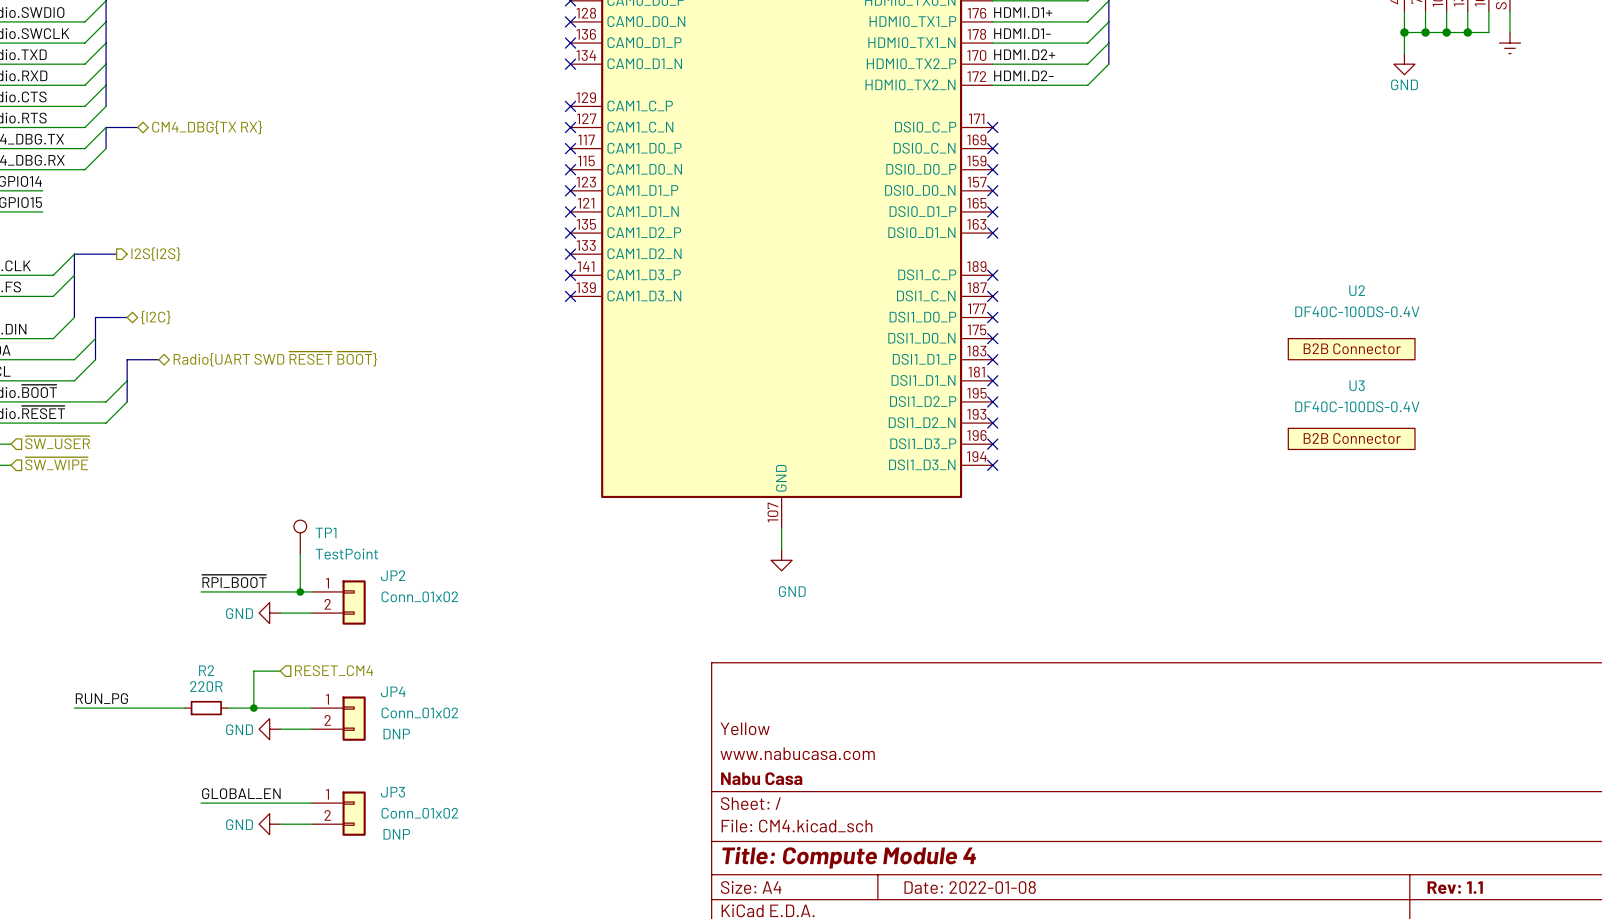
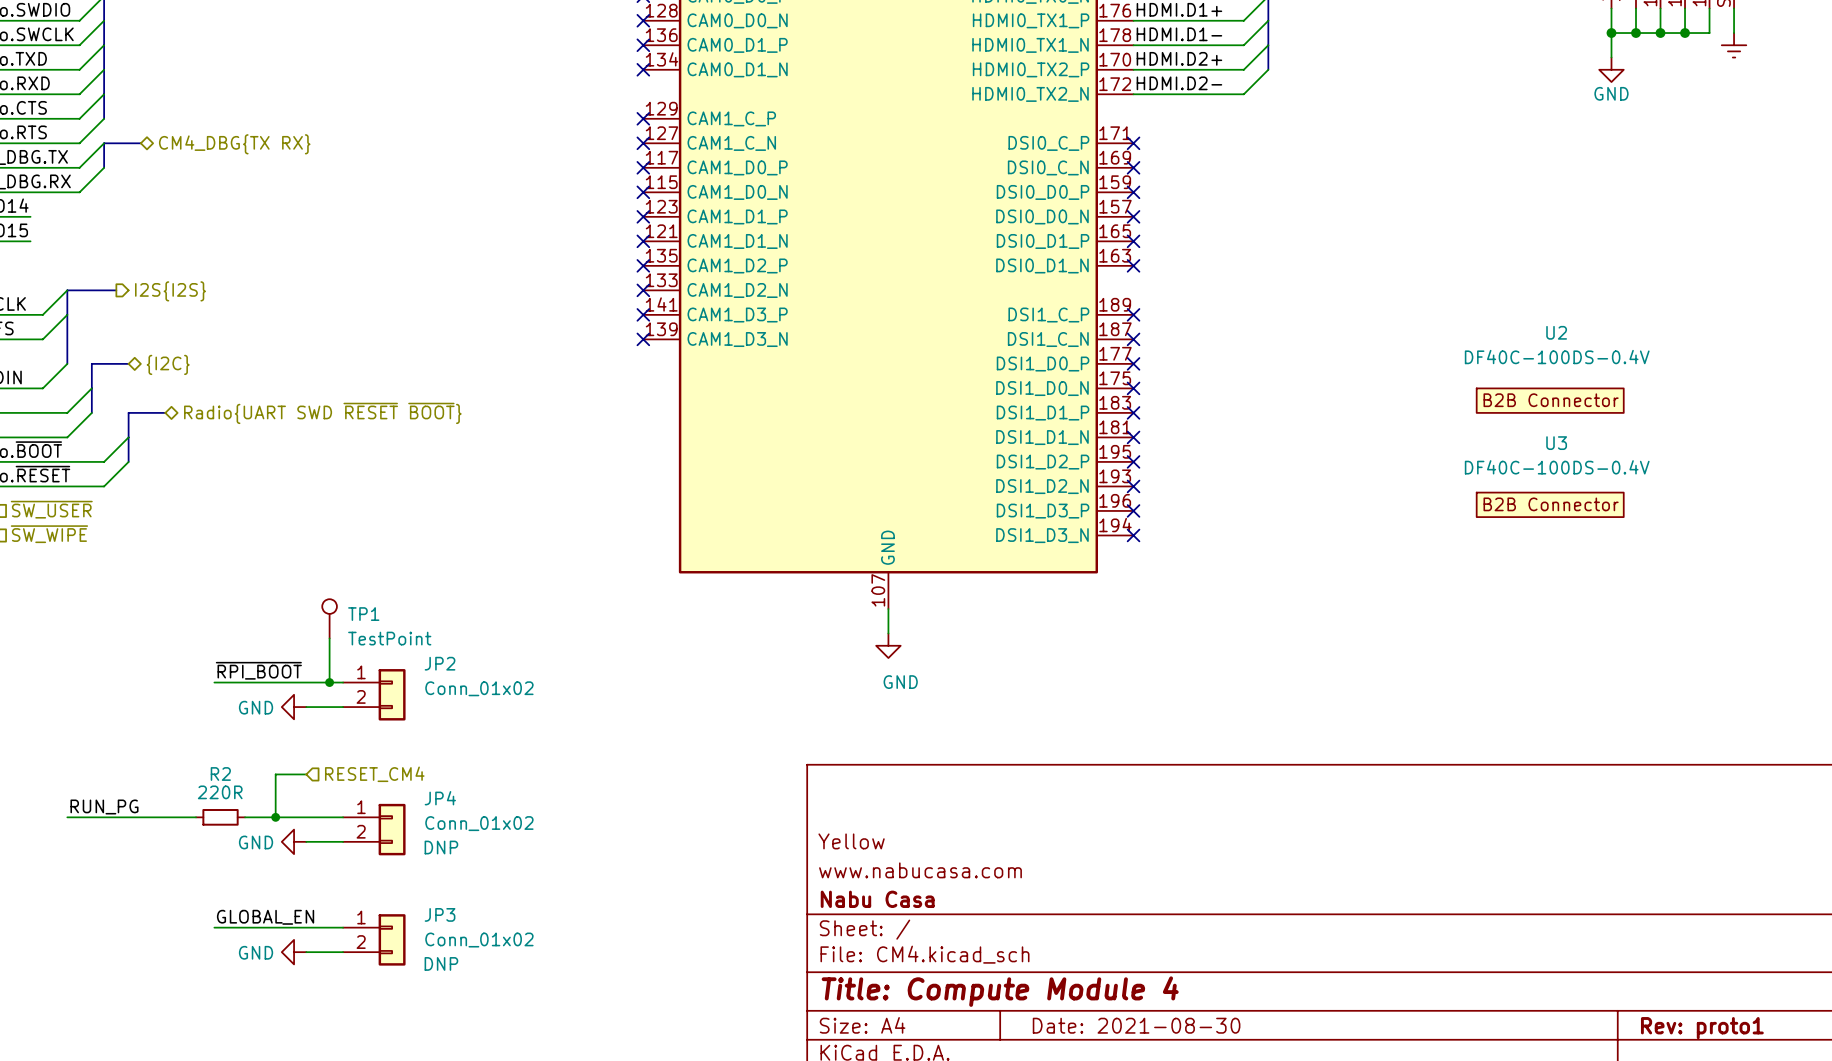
title block: Date: 2022-01-08 (970, 887) -> Date: 2021-08-30 (1136, 1025)
title block: Rev: 1.1 (1455, 887) -> Rev: proto1 (1702, 1028)

